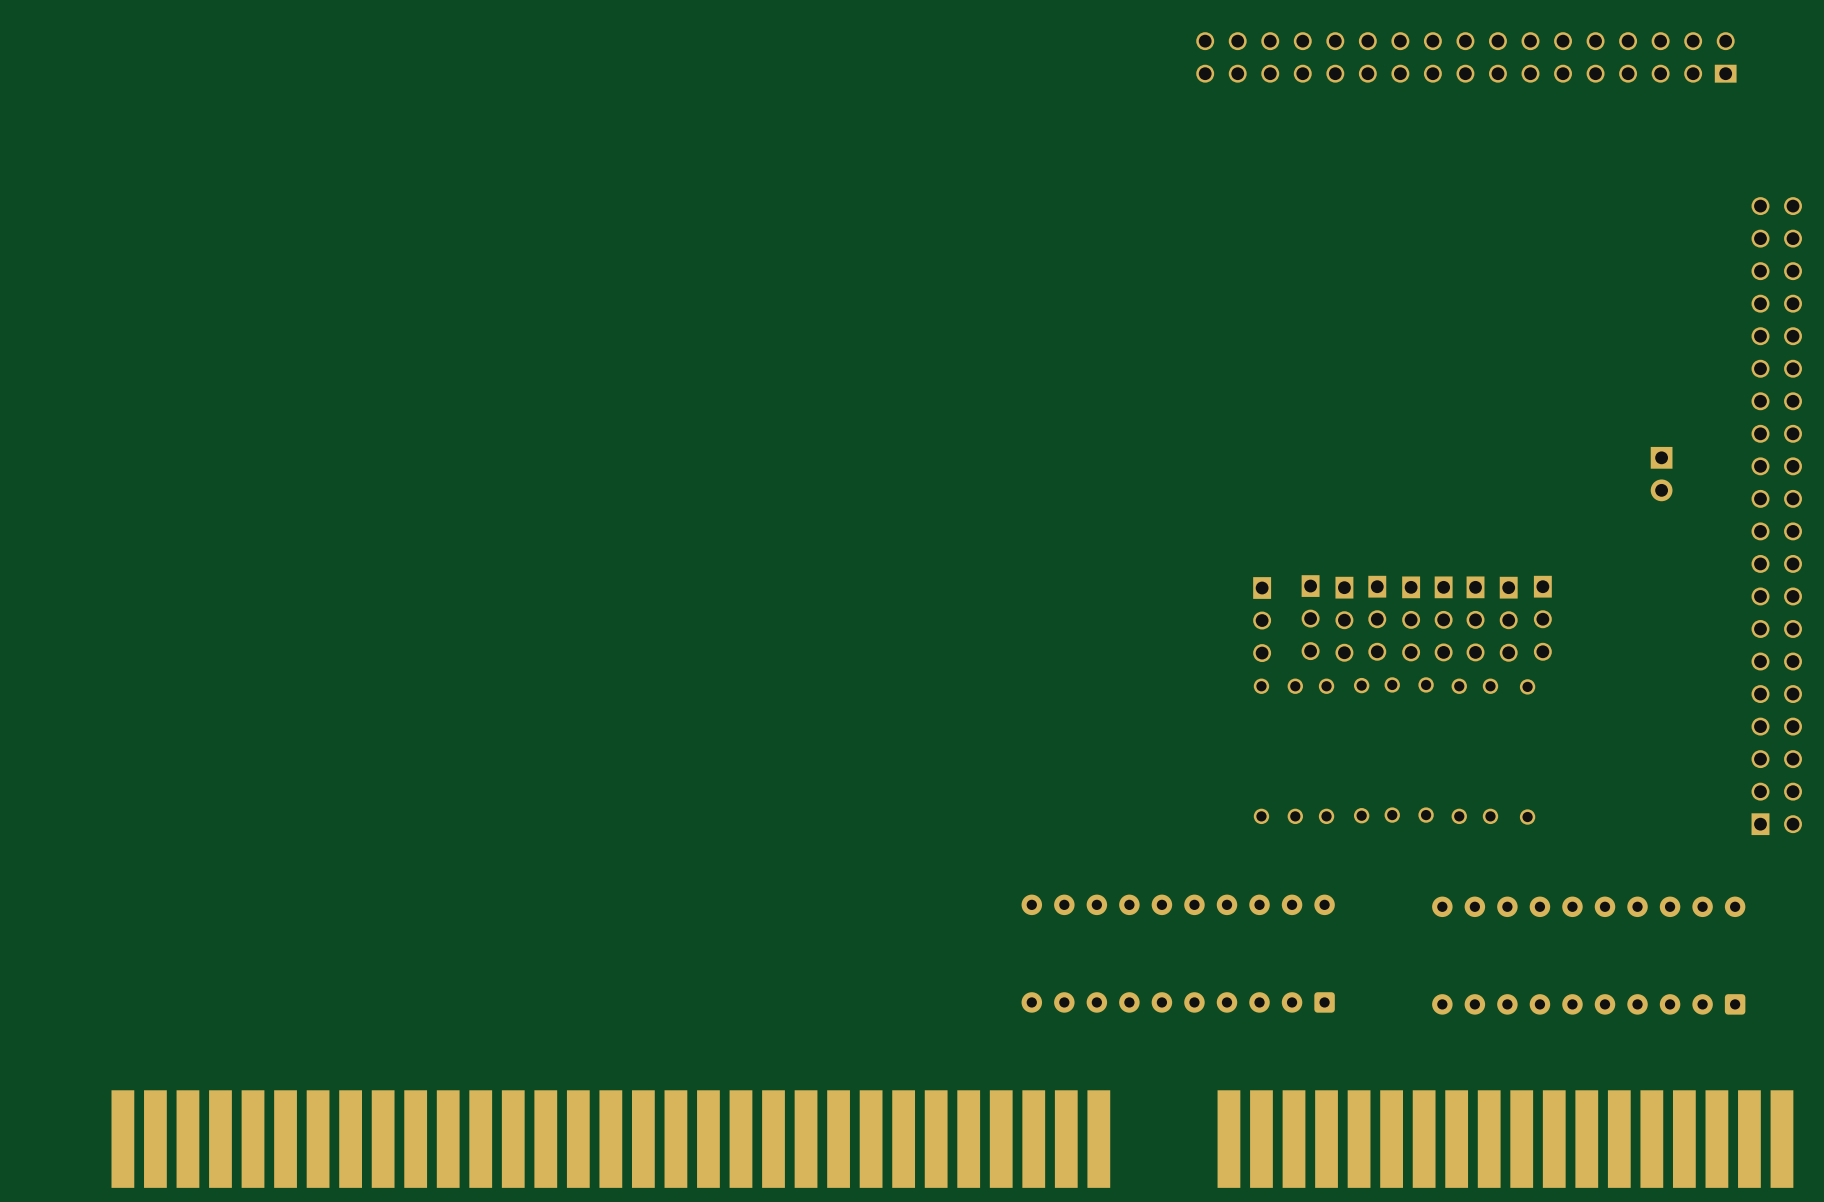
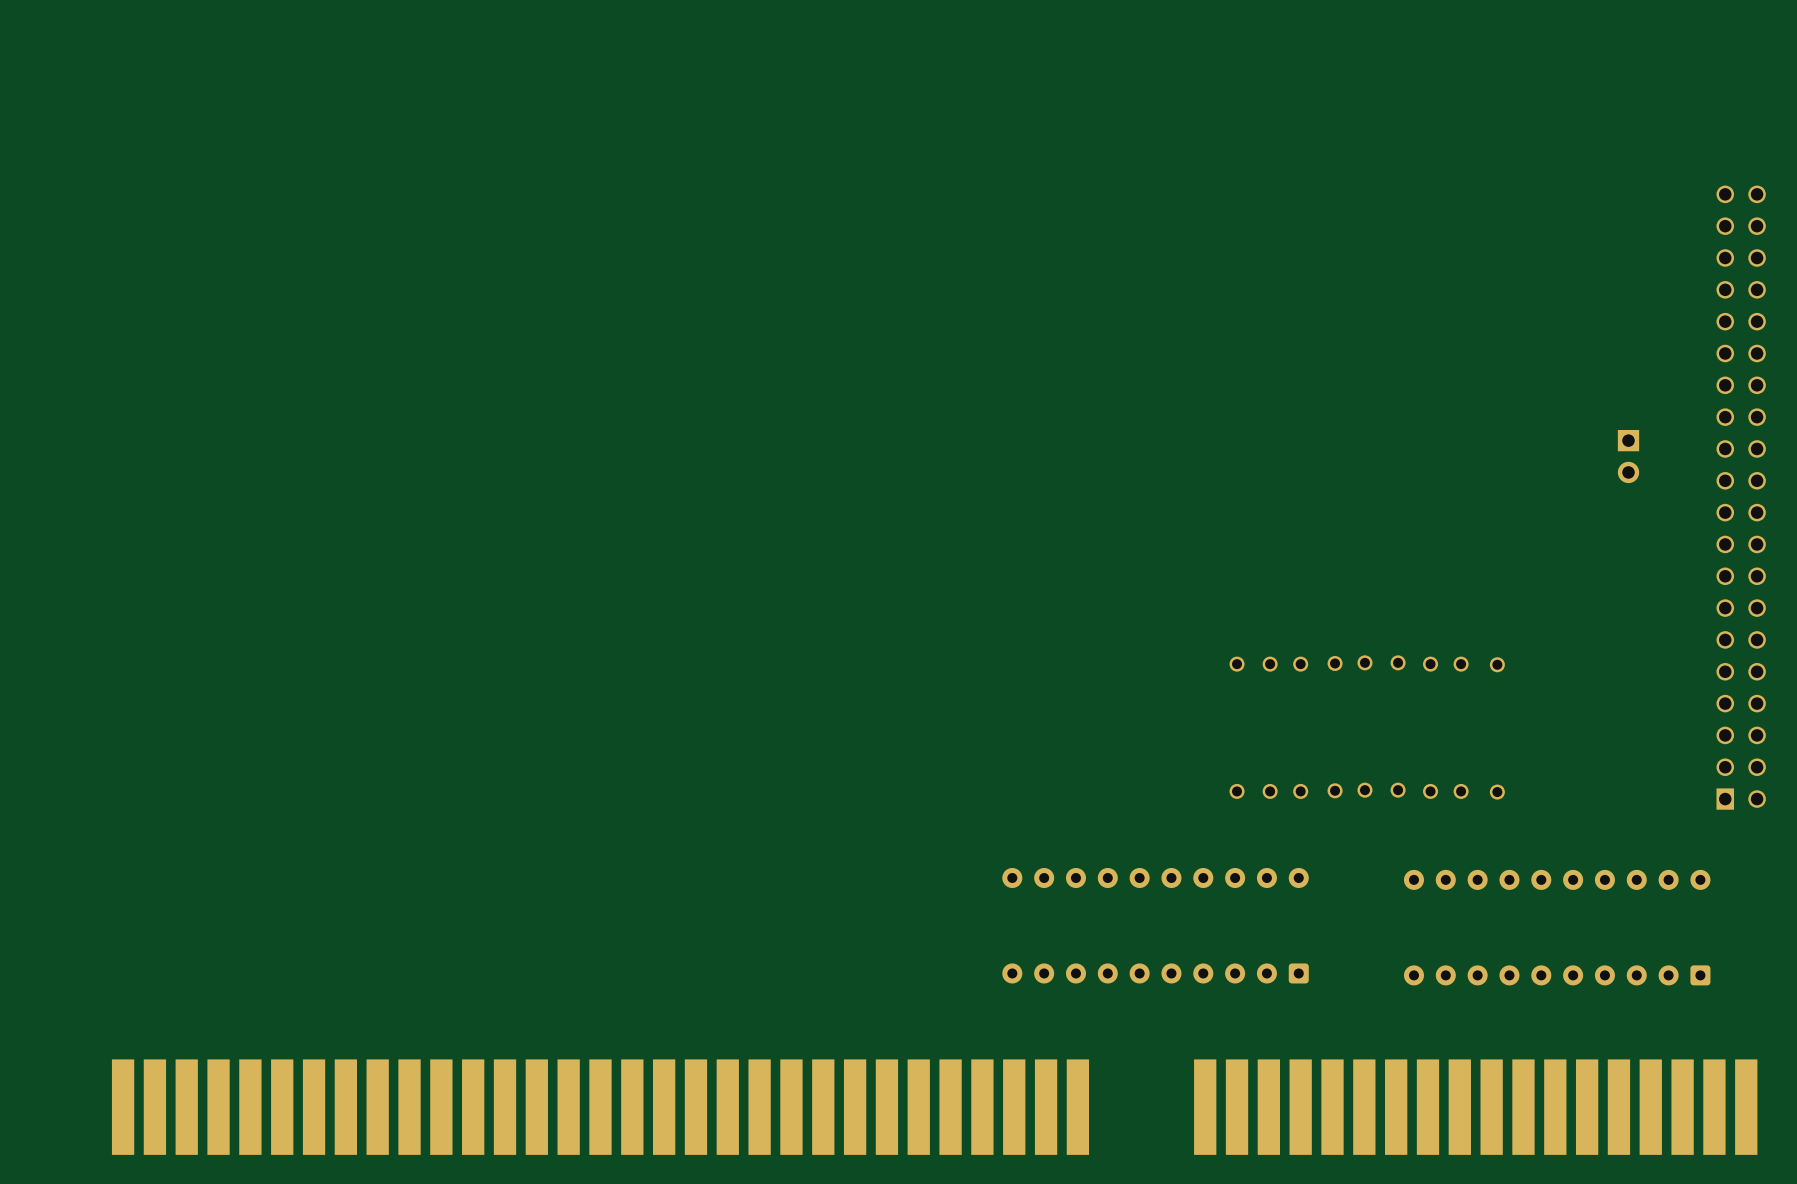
part: (1466, 57) -> none
part: (1310, 617) -> none
part: (1377, 618) -> none
part: (1411, 618) -> none
part: (1443, 618) -> none
part: (1475, 618) -> none
part: (1542, 618) -> none
part: (1262, 619) -> none
part: (1344, 619) -> none
part: (1508, 619) -> none

